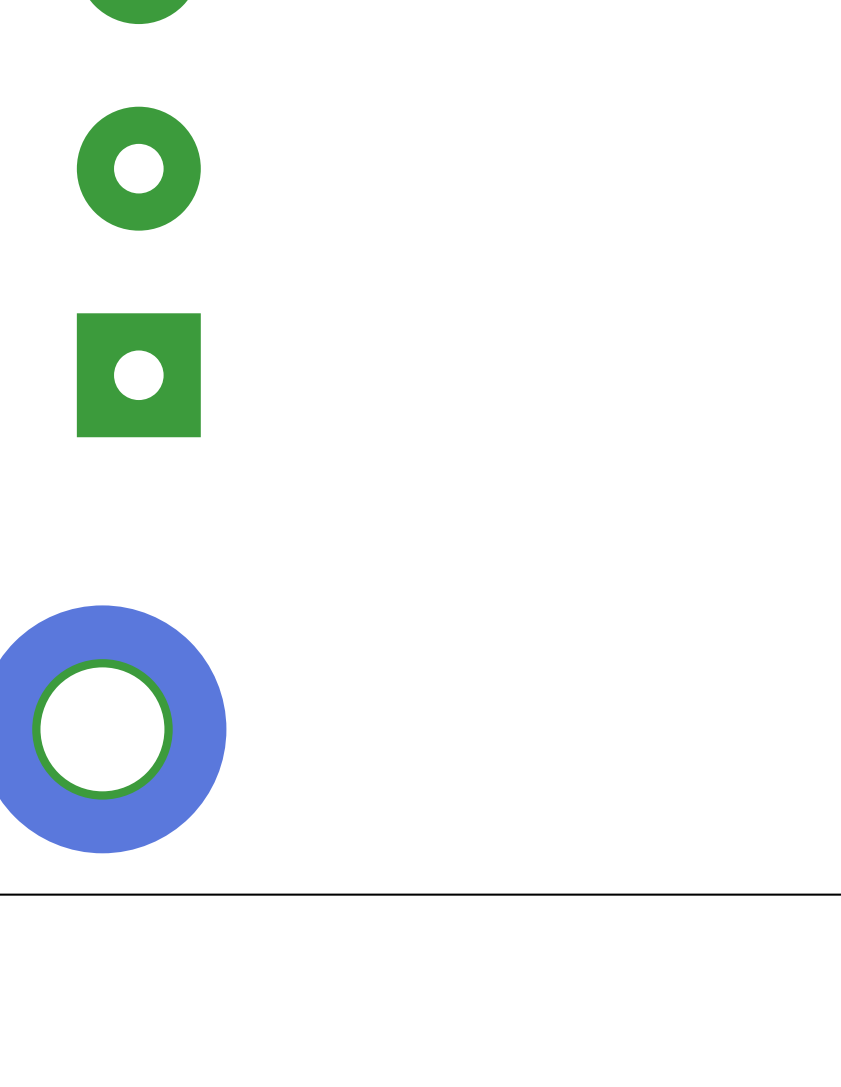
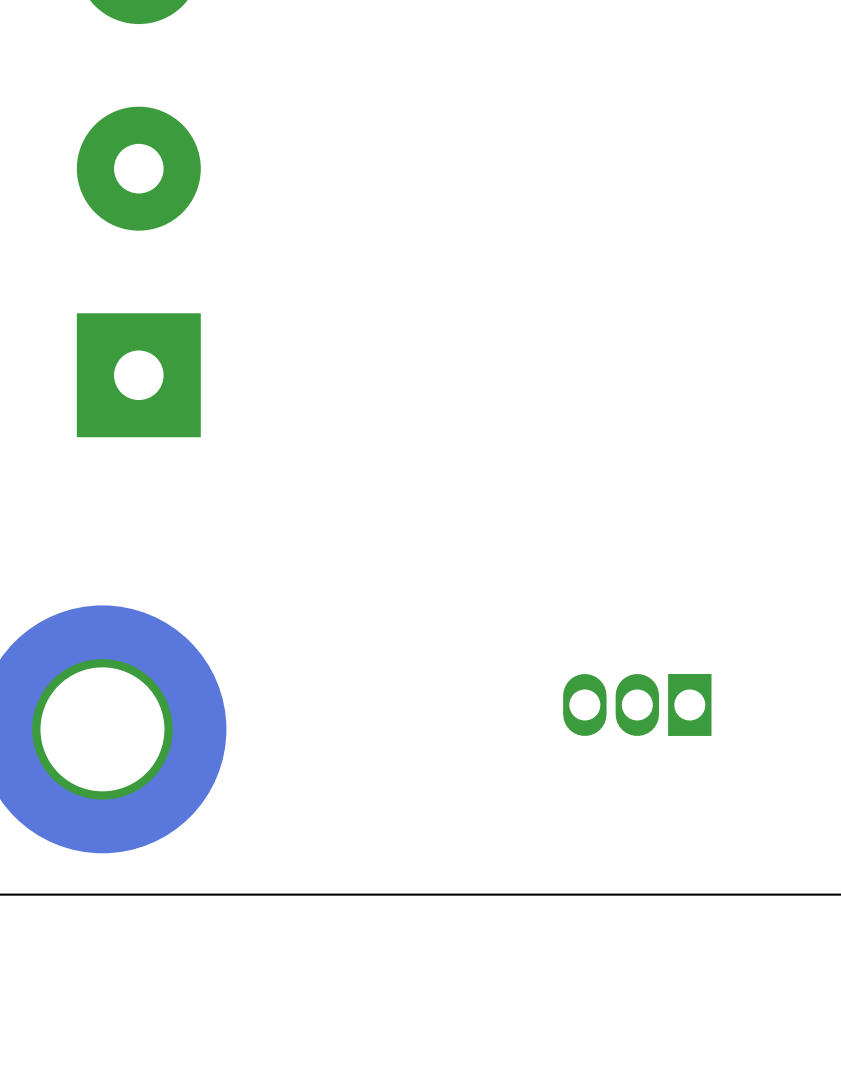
part: none -> (637, 704)

